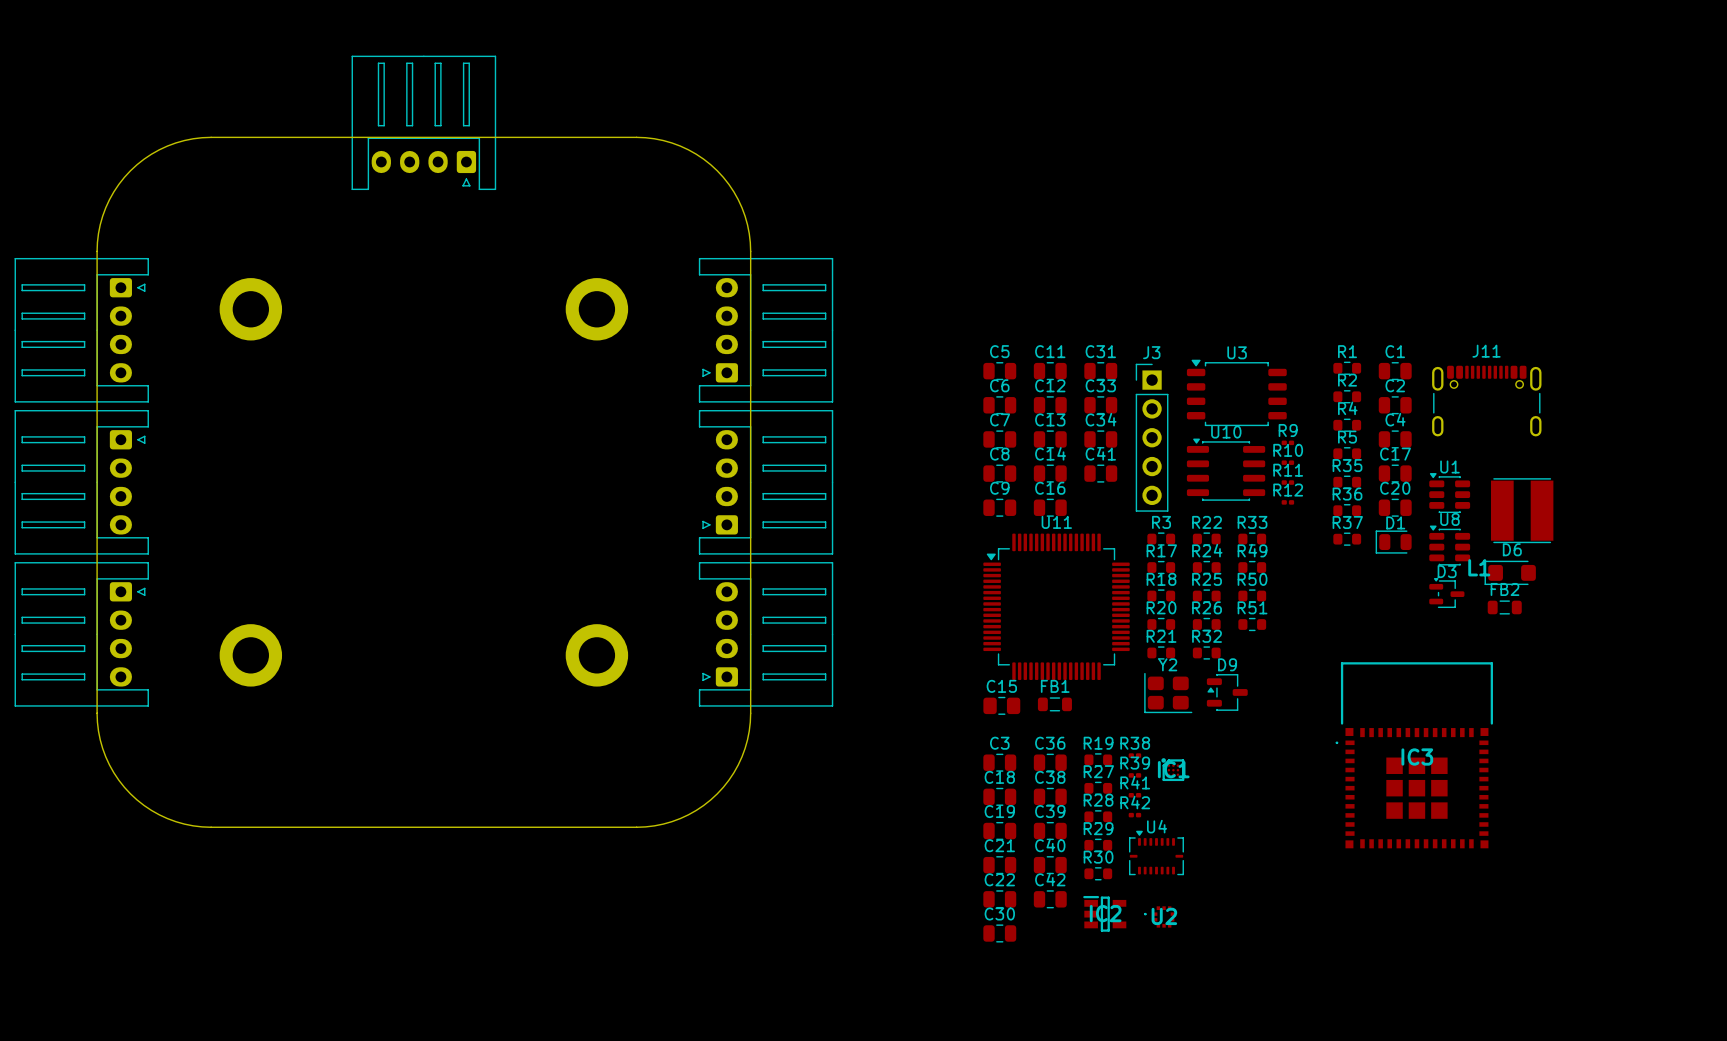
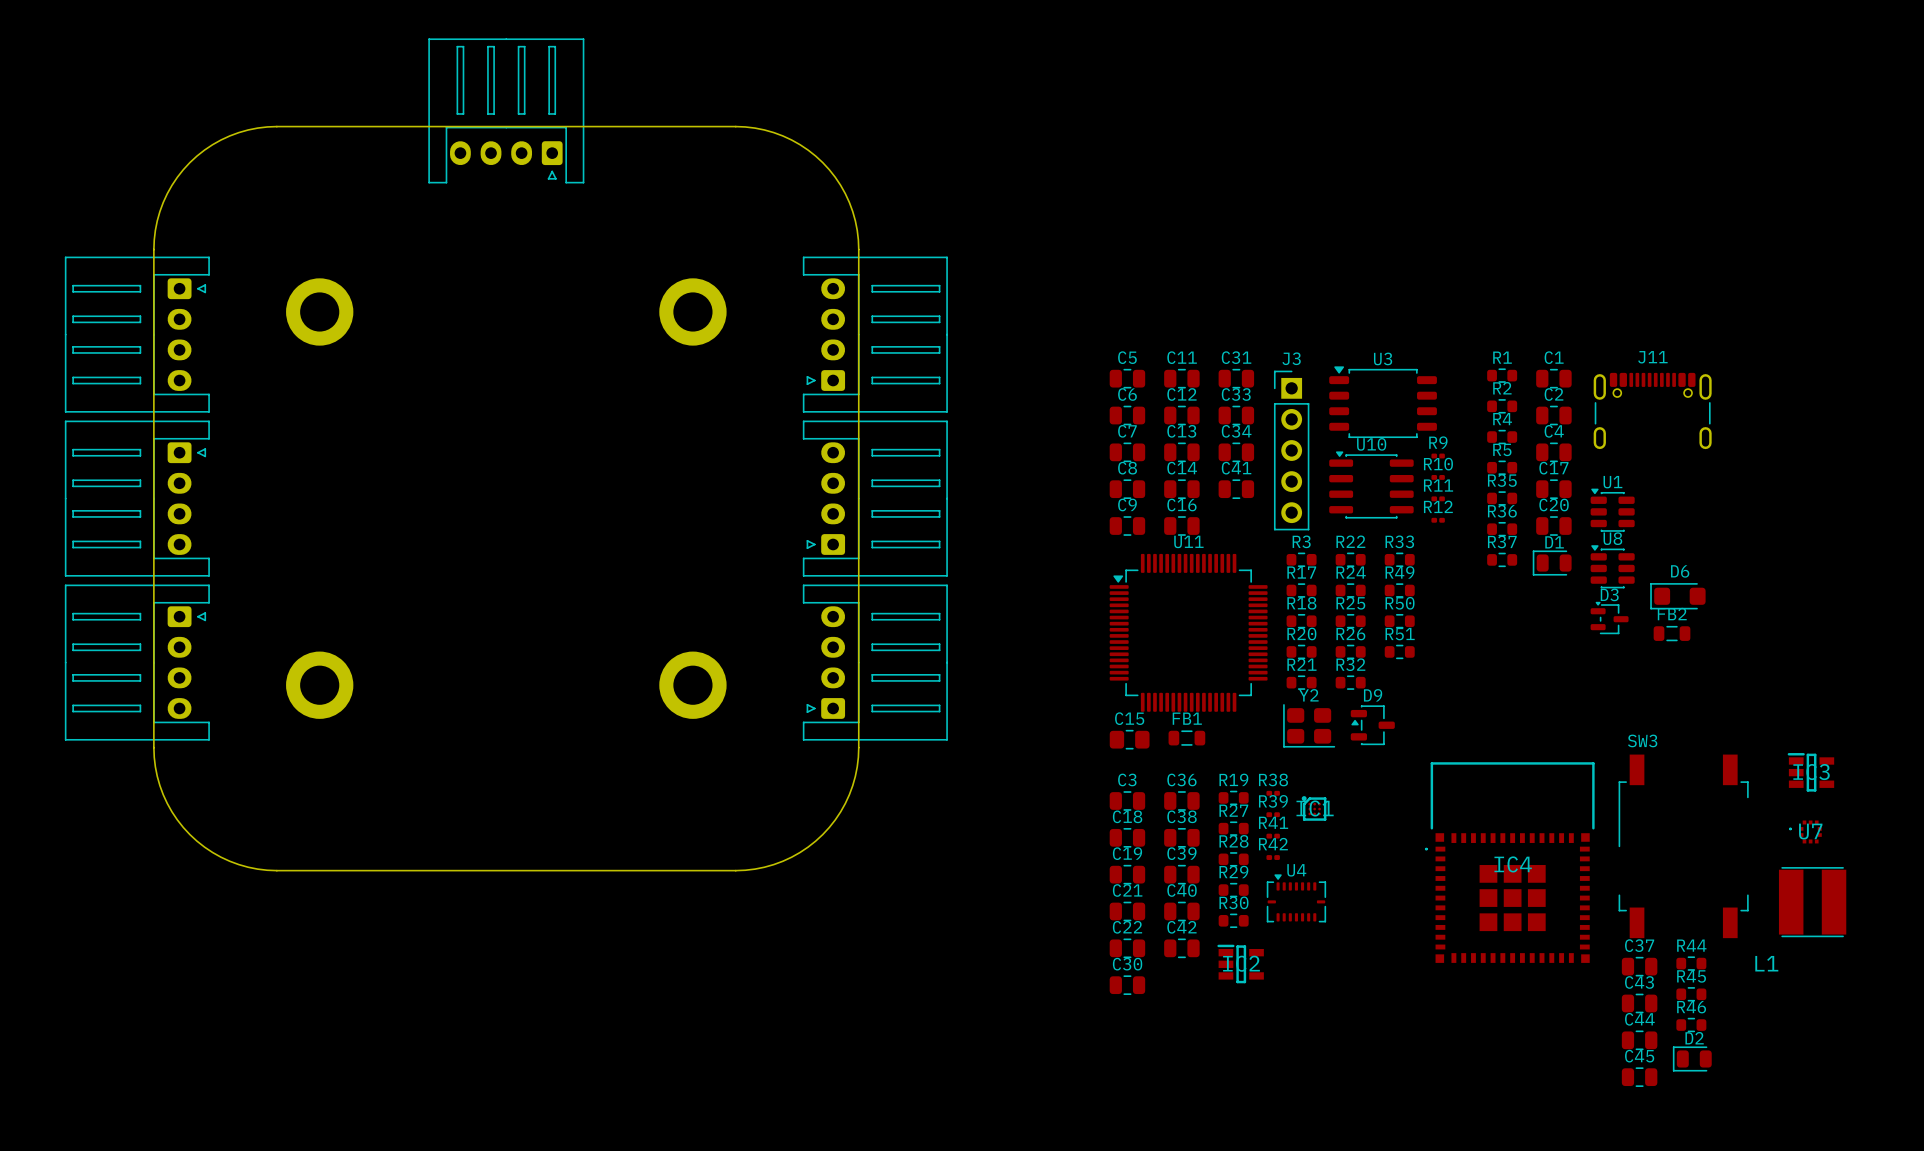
L1 position: (1522, 510) -> (1812, 902)
IC3 footprint: [1335, 662, 1493, 849] -> [1787, 753, 1835, 792]
U7: none -> (1805, 831)
SW3: none -> (1683, 846)
IC4: none -> (1509, 862)
R44: none -> (1691, 963)
U2: (1159, 916) -> none
C37: none -> (1639, 966)
R45: none -> (1691, 994)
C43: none -> (1639, 1003)
R46: none -> (1691, 1025)
C44: none -> (1639, 1040)
D2: none -> (1692, 1058)
C45: none -> (1639, 1077)

